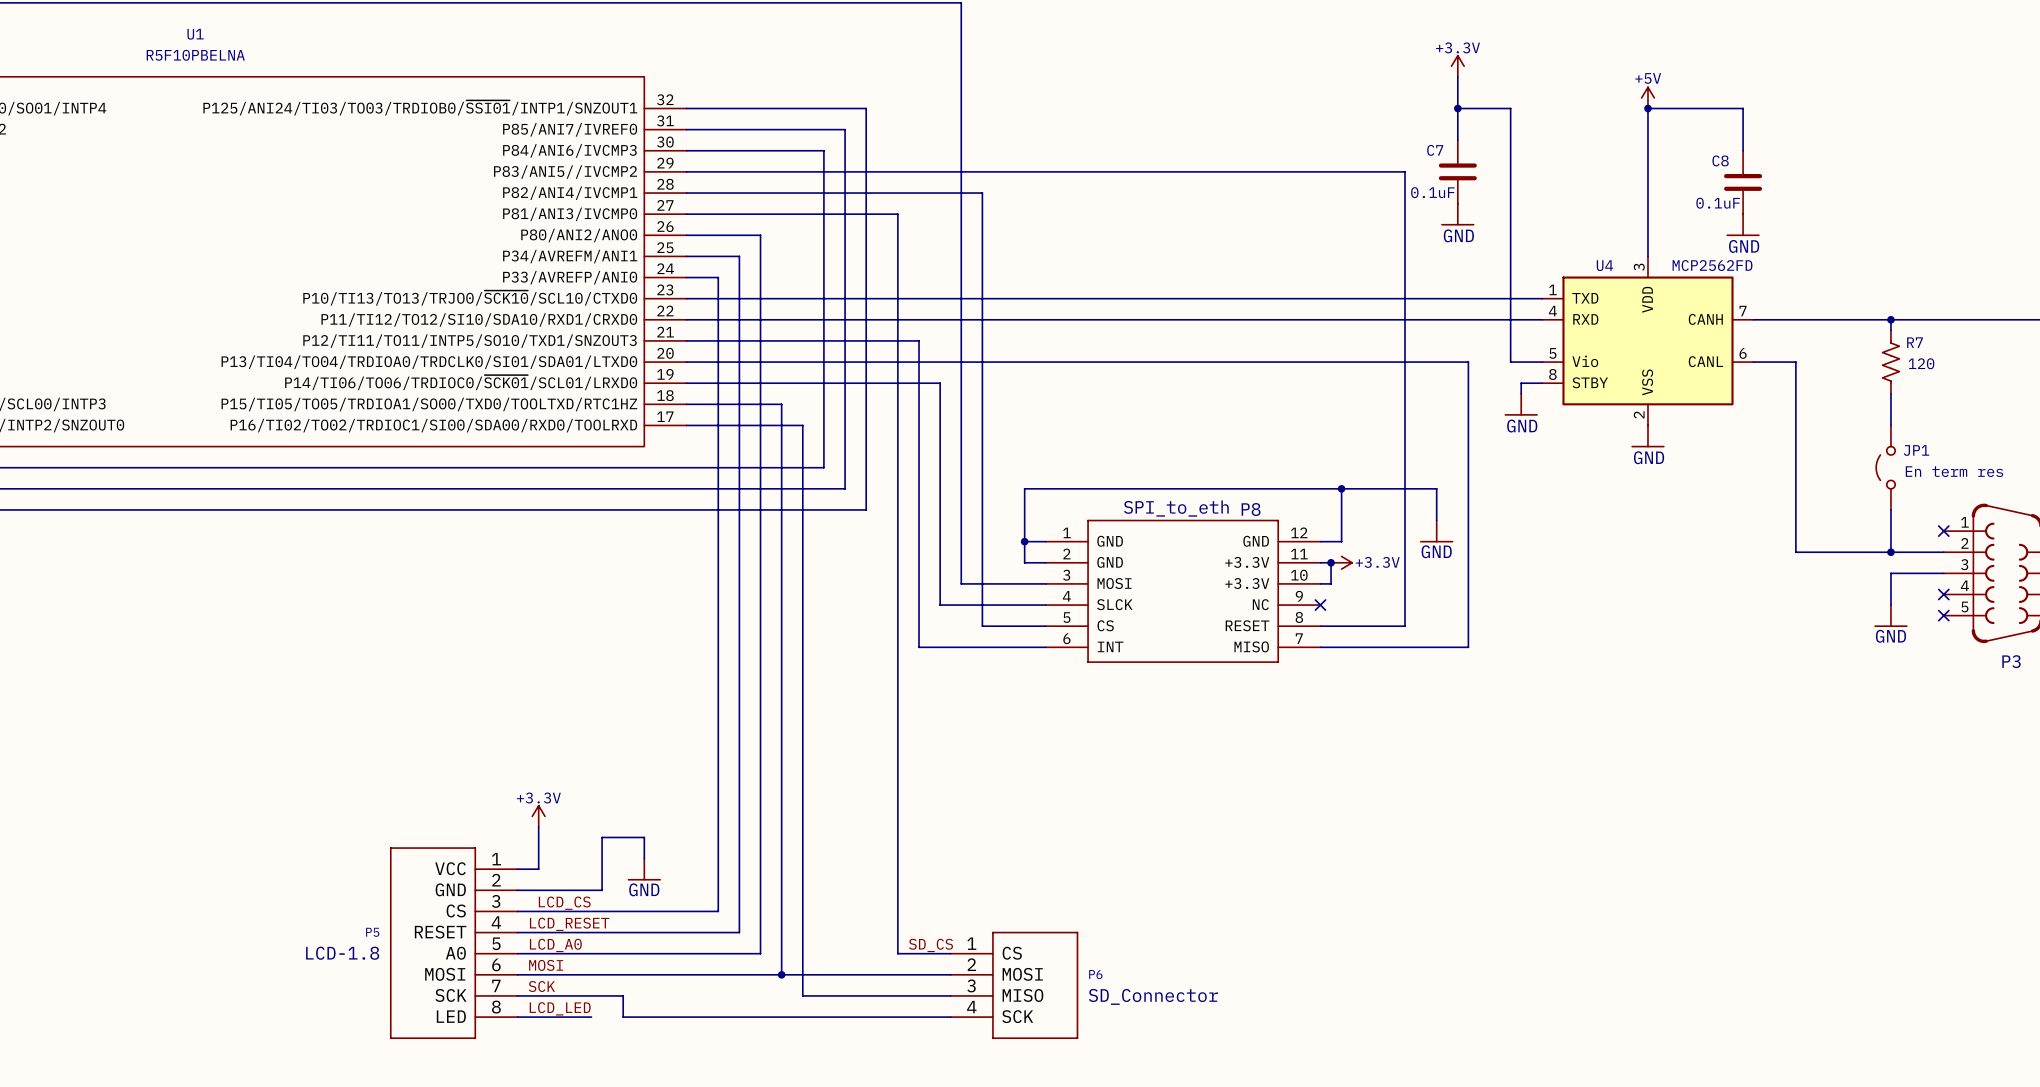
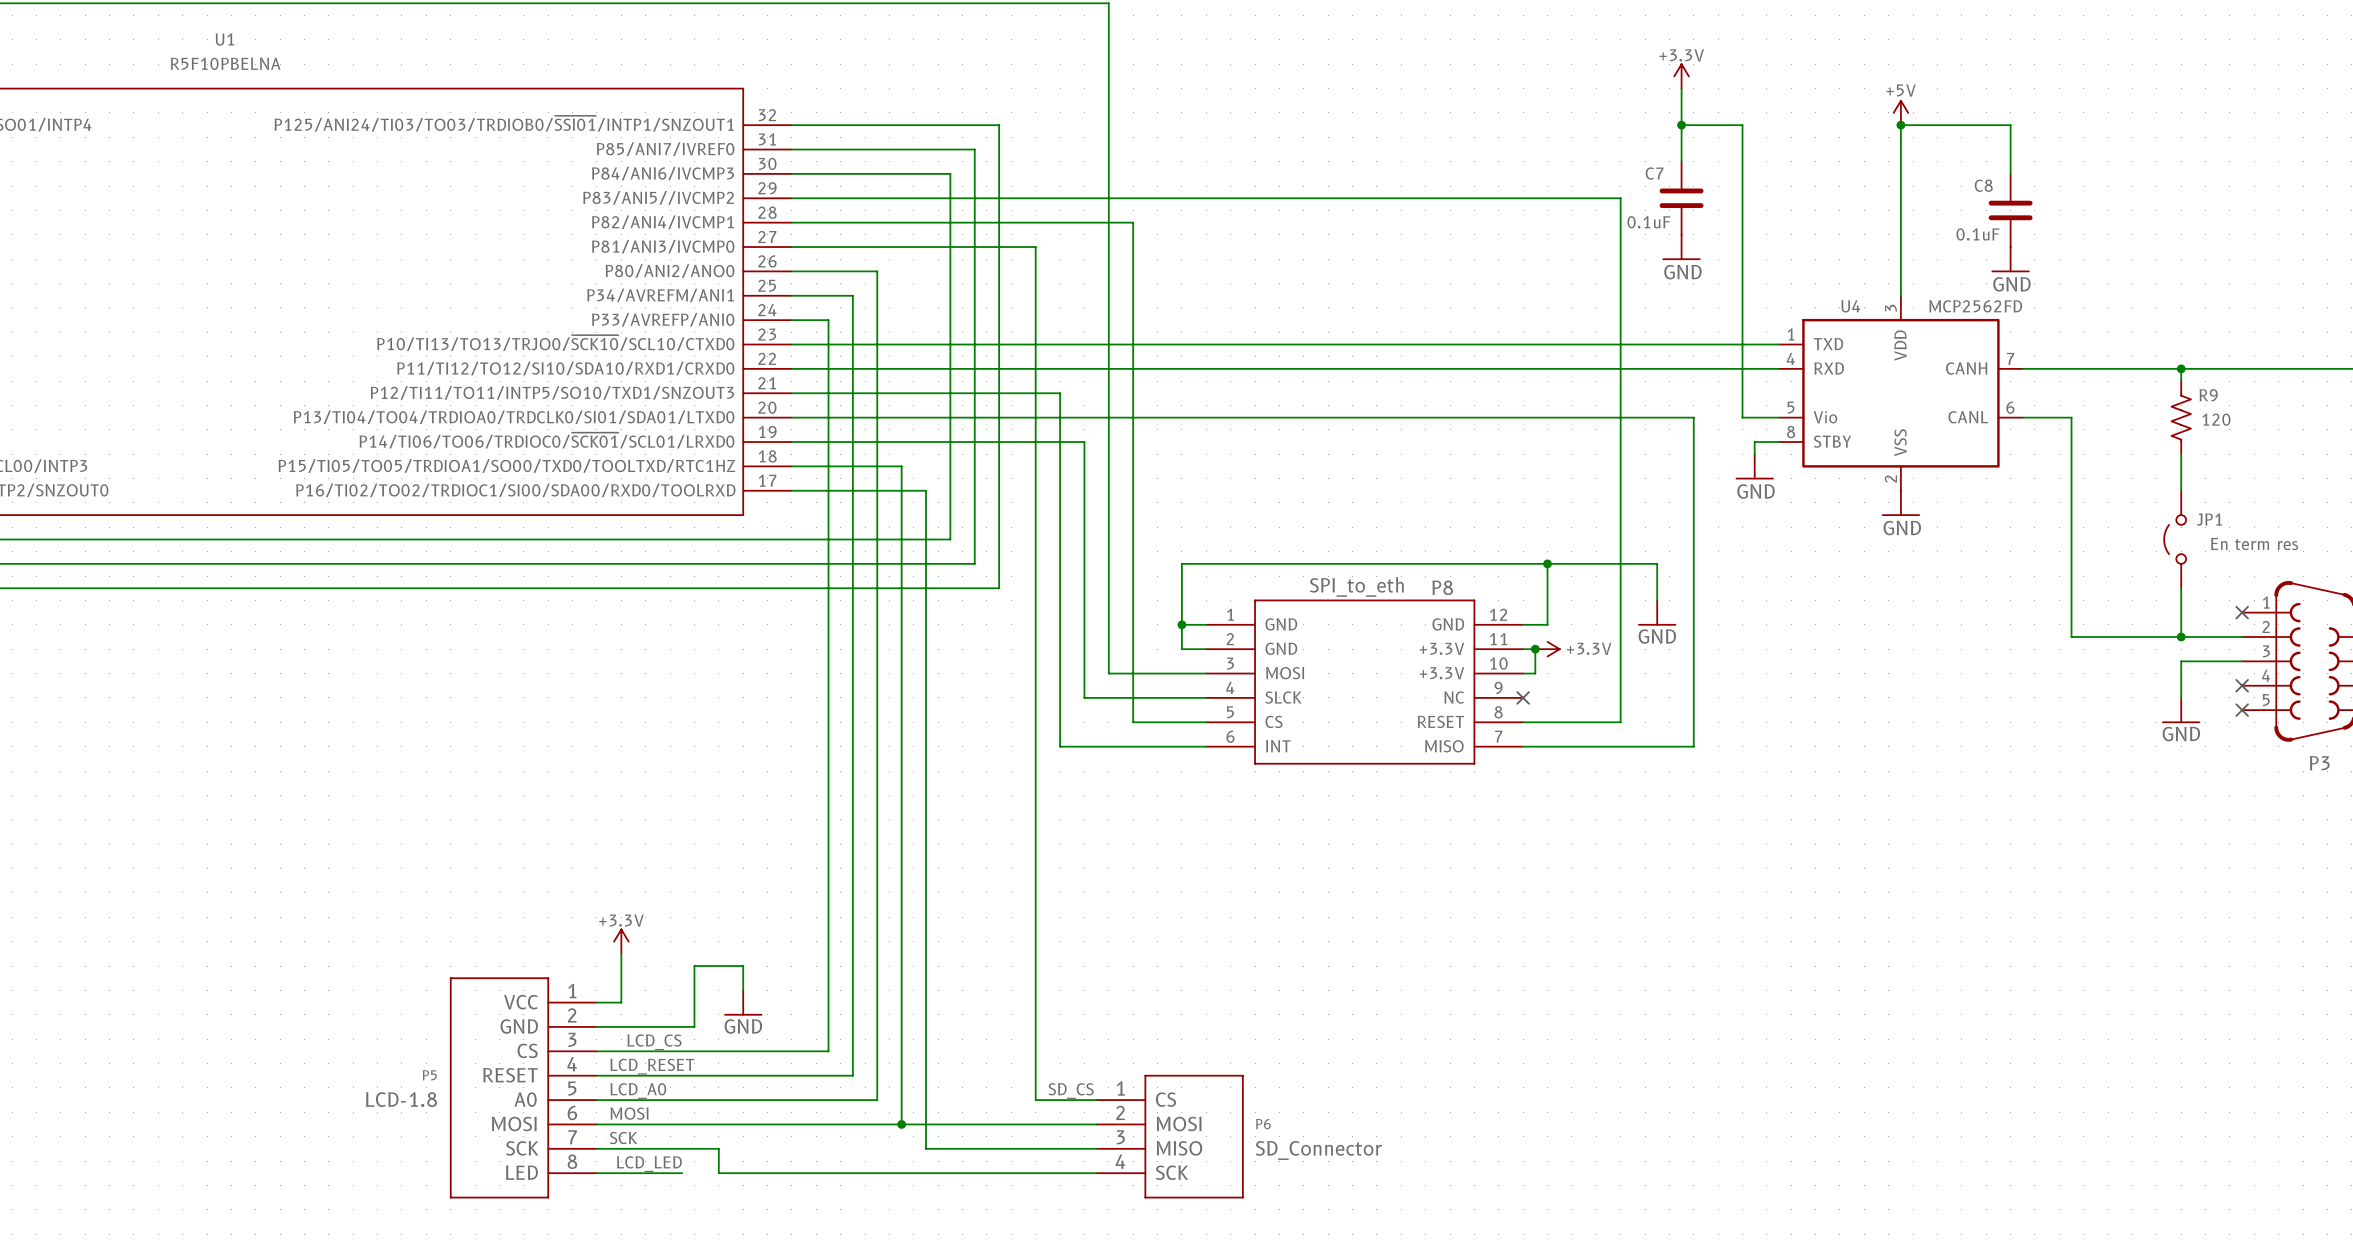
R7 name: R7 (1915, 342) -> R9 (2208, 395)

